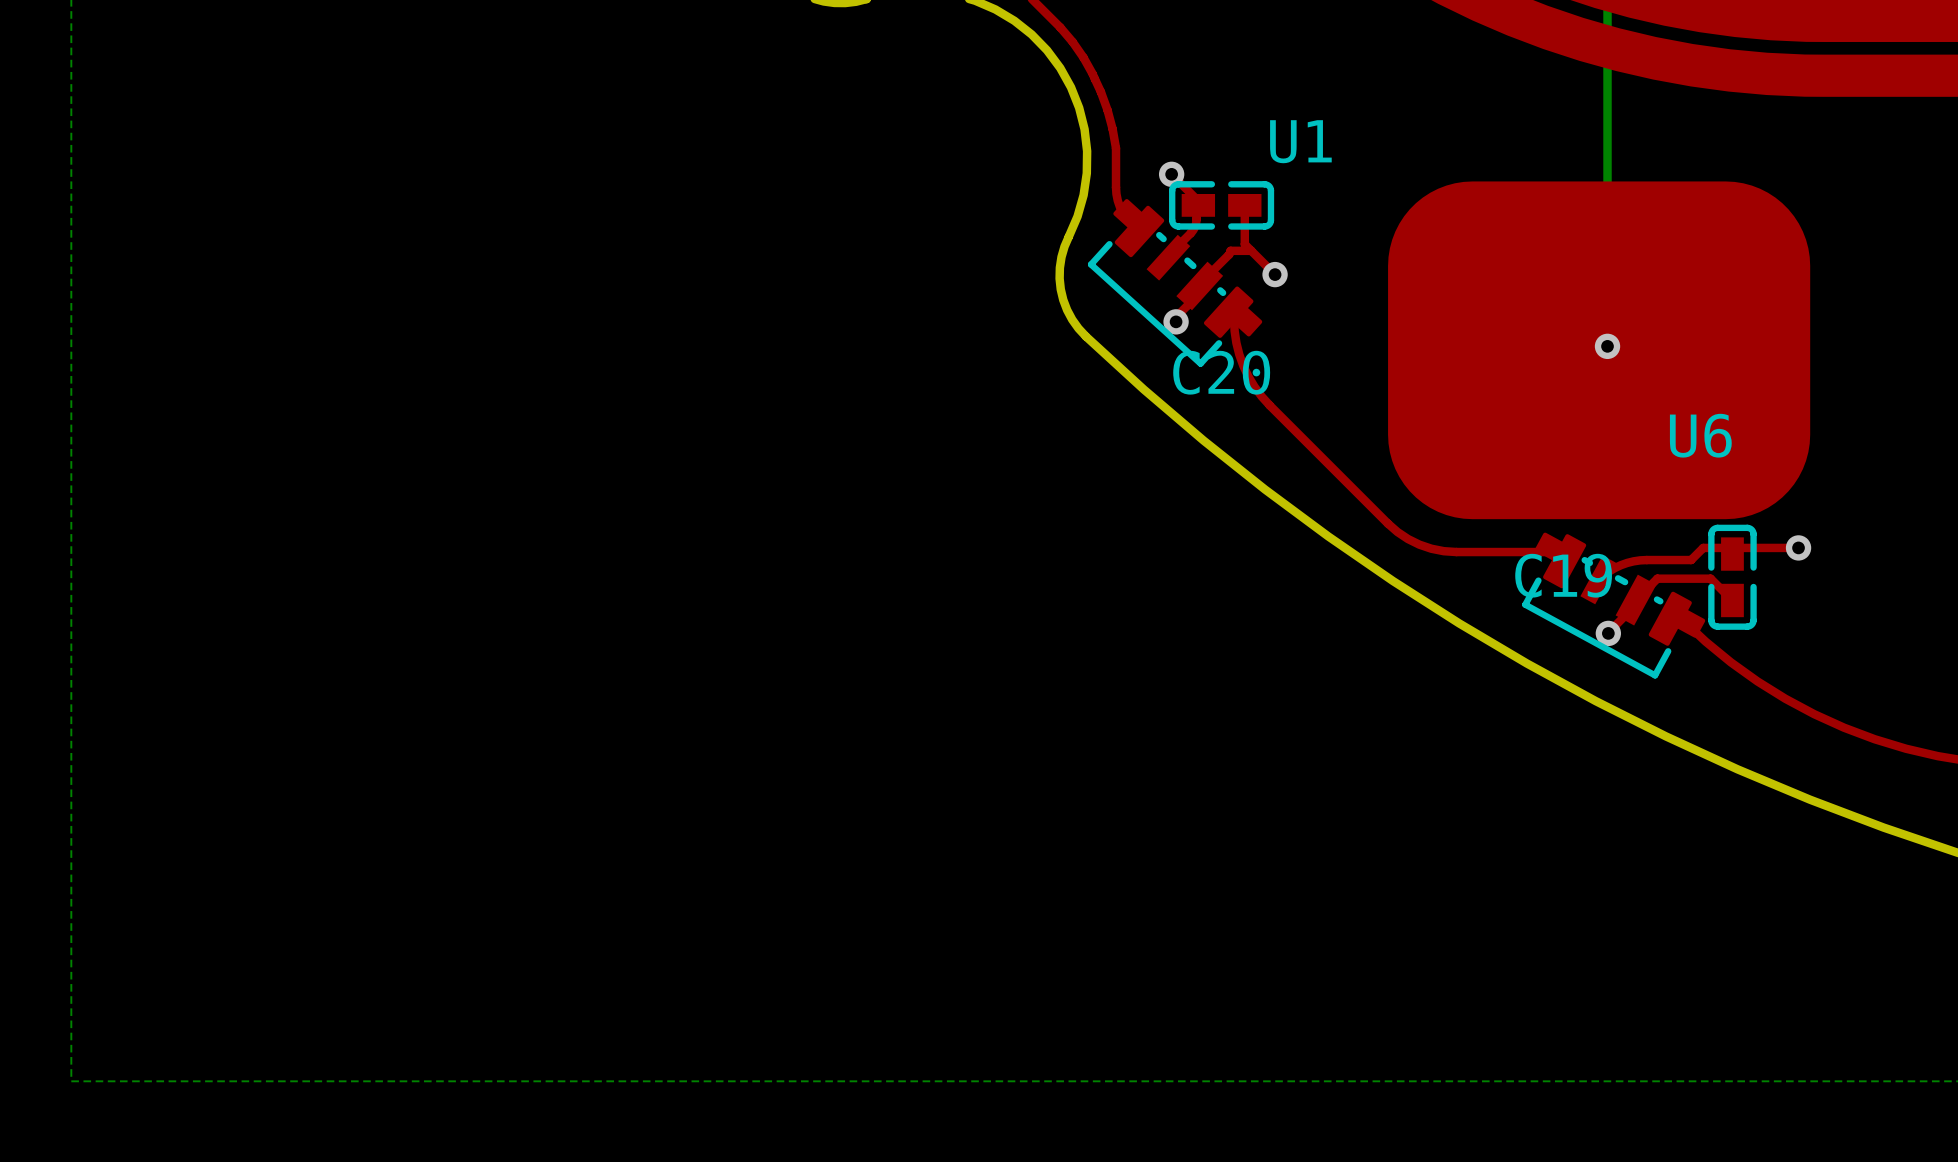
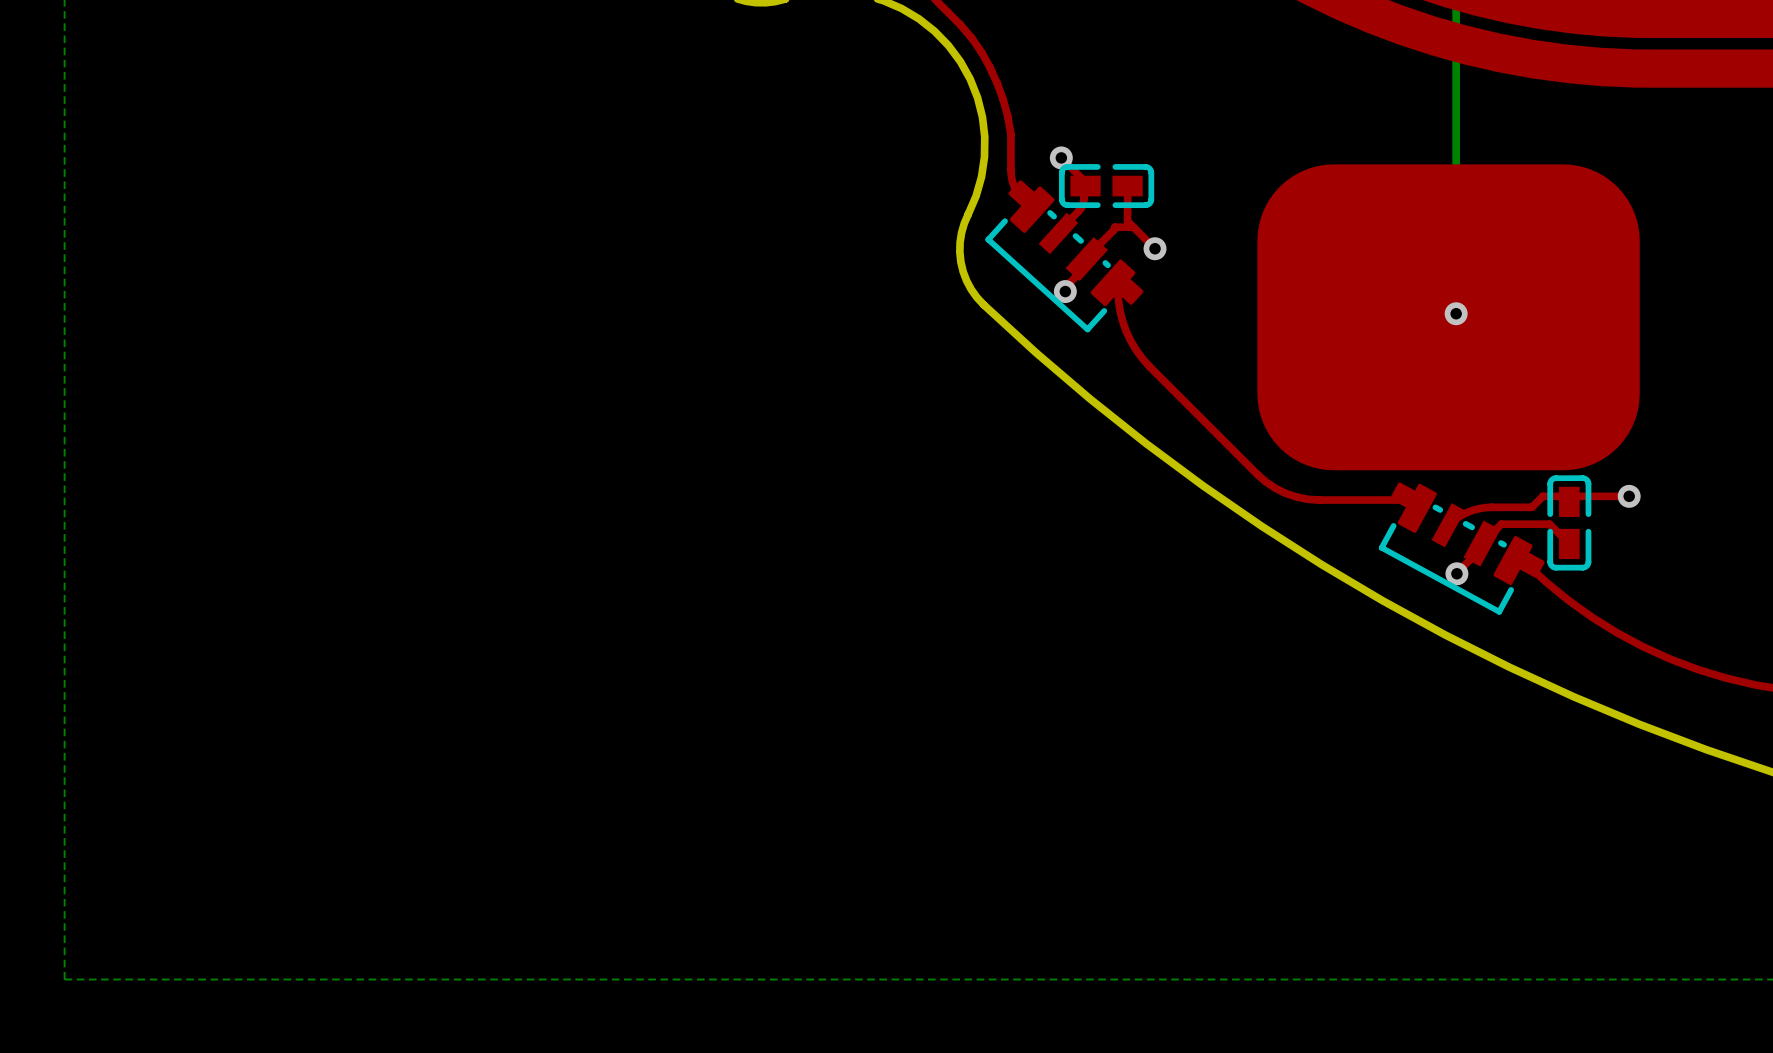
U1 name: U1 (1300, 141) -> none
C20 name: C20 (1221, 372) -> none
U6 name: U6 (1700, 435) -> none
C19 name: C19 (1563, 575) -> none

